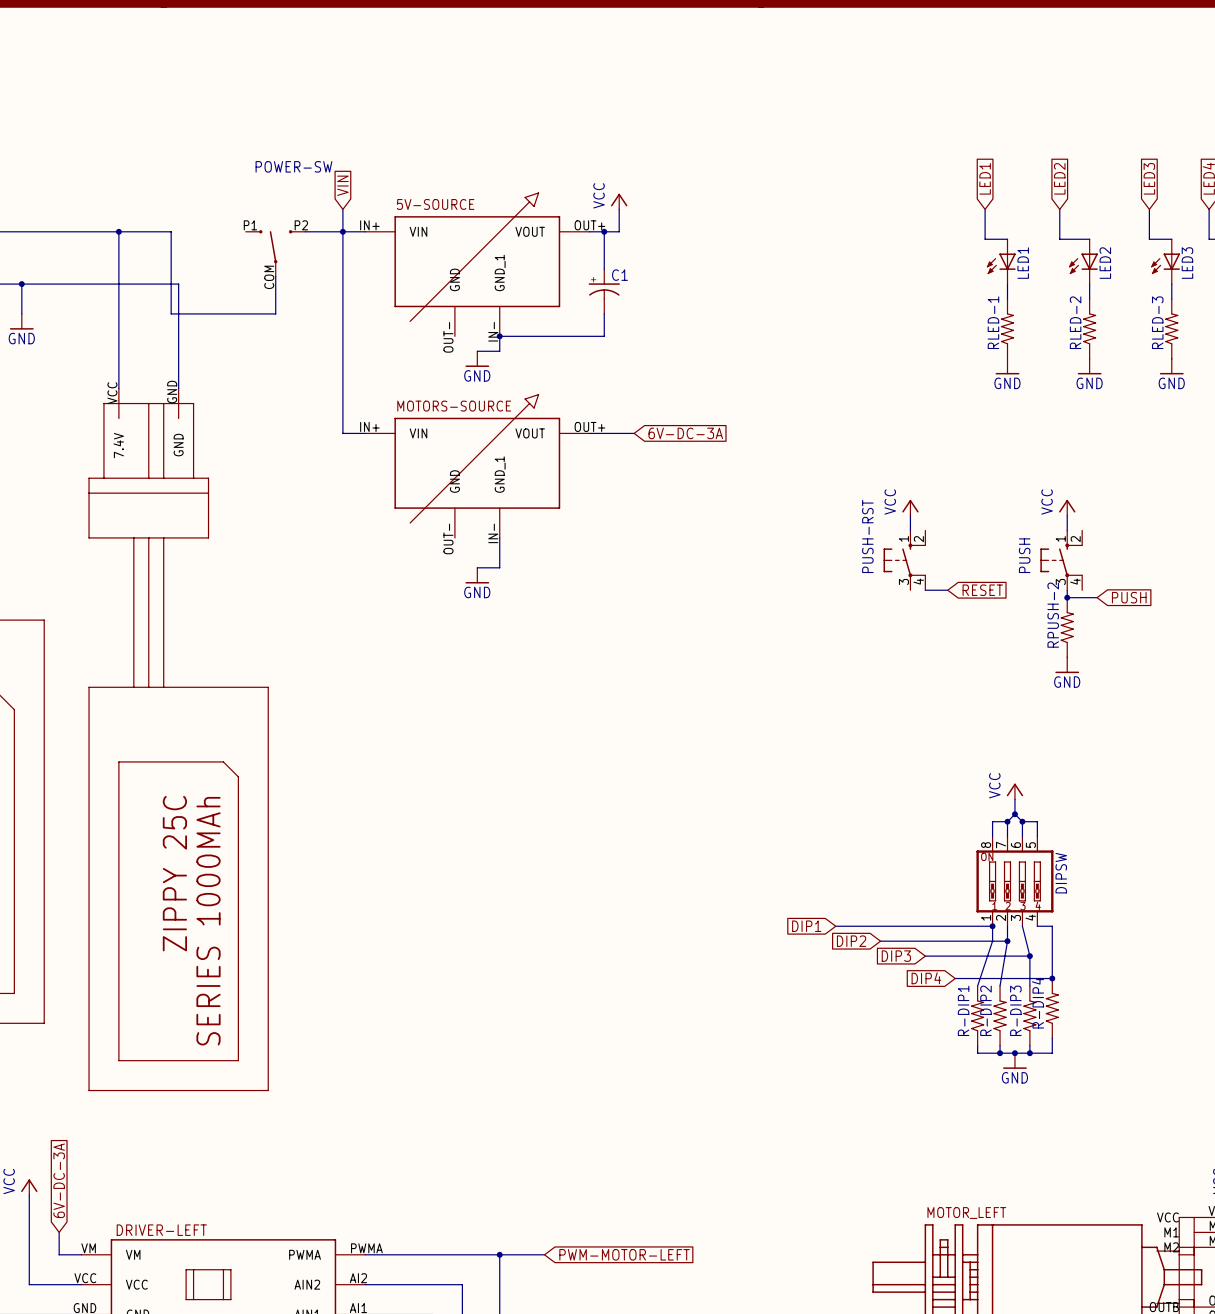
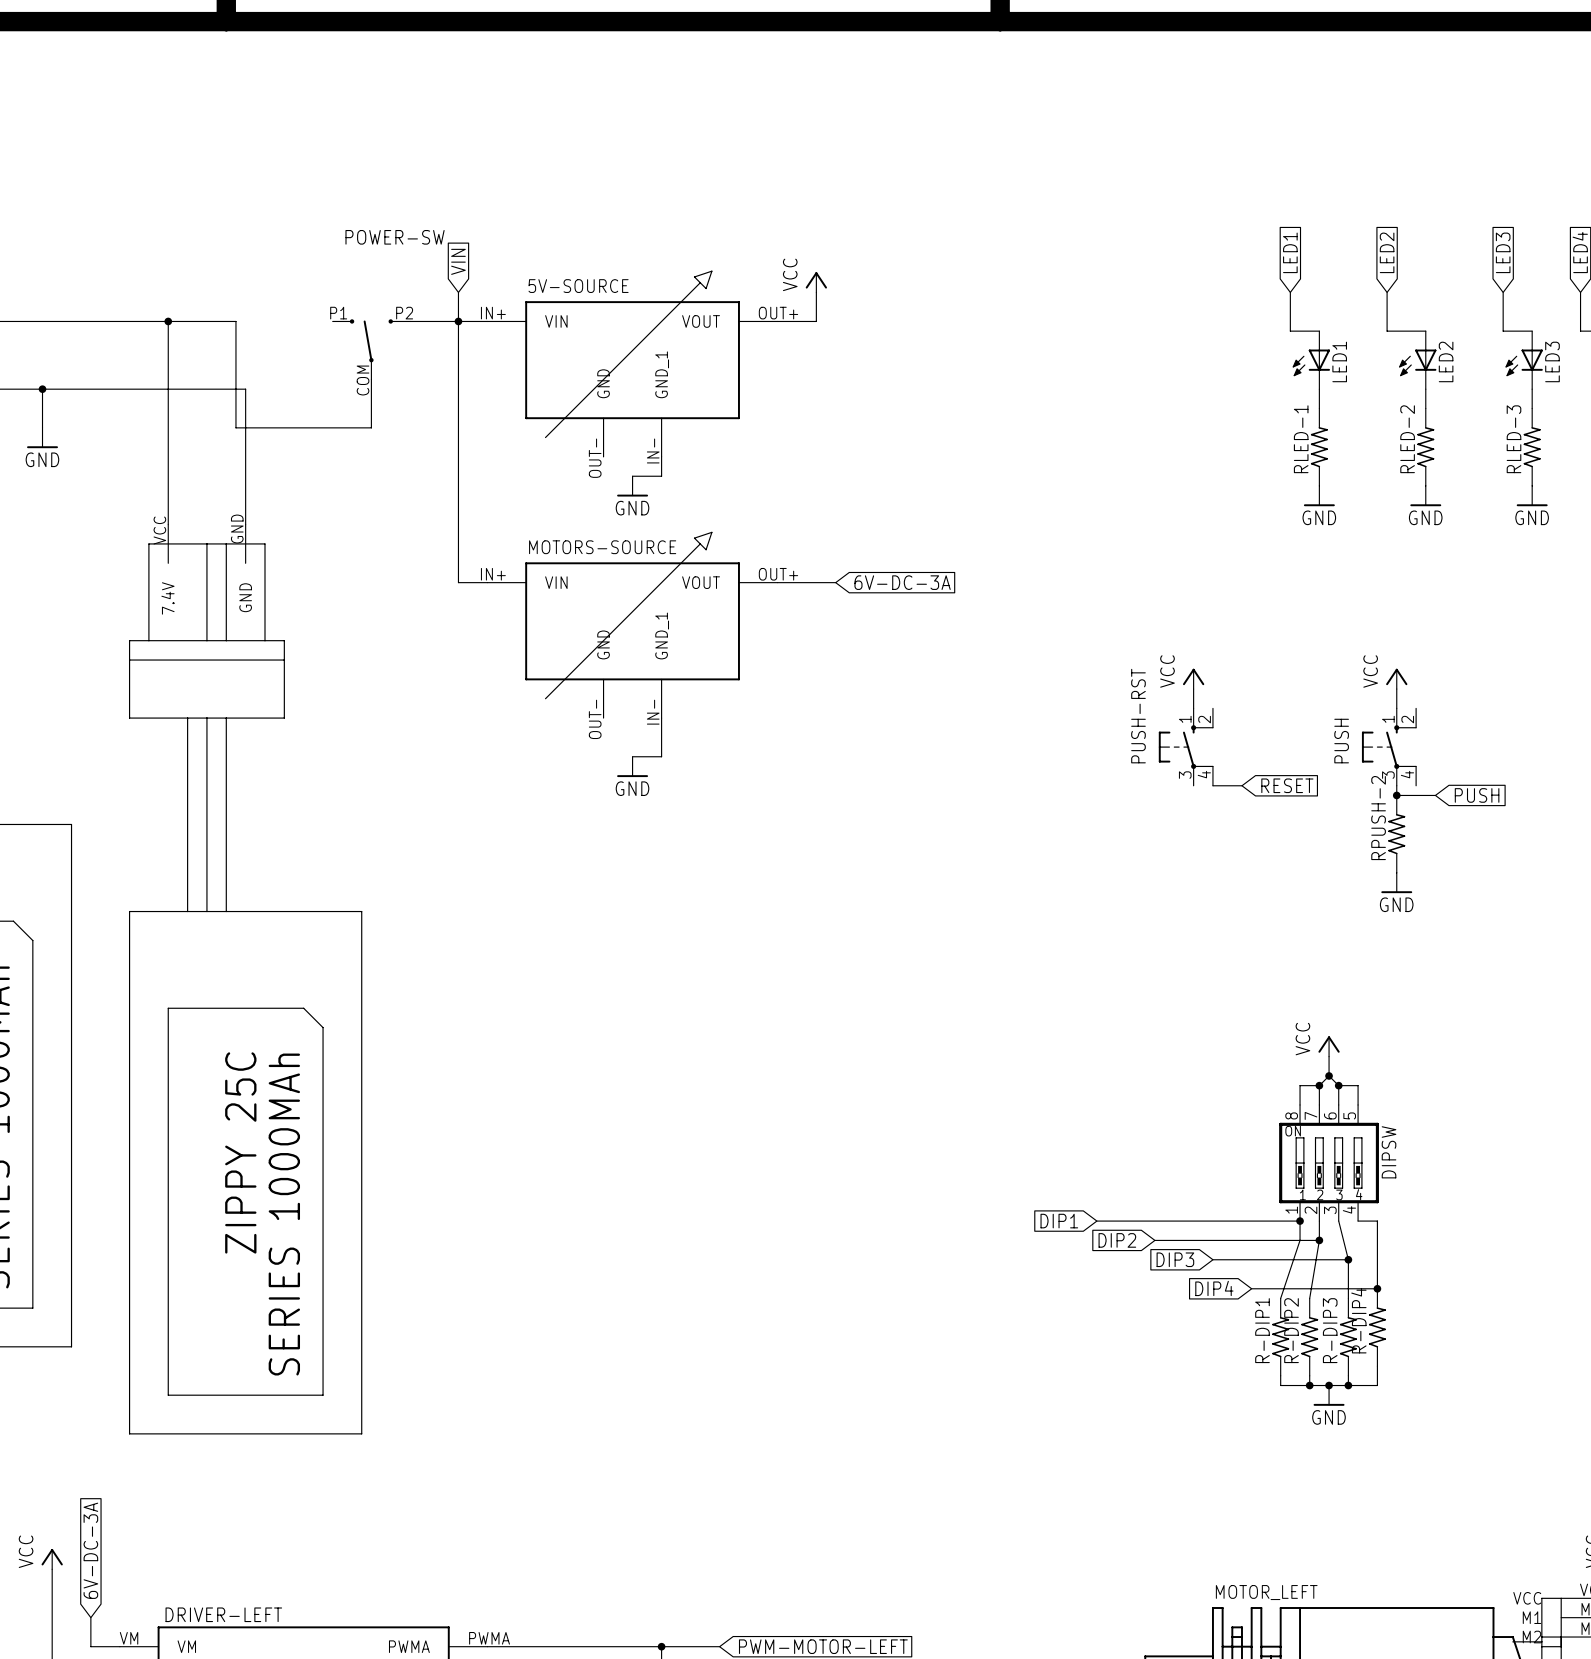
wire: (604, 231) (604, 269) -> none
junction: (604, 231) -> none
C1: (604, 291) -> none
wire: (604, 313) (604, 336) (499, 336) -> none
junction: (499, 336) -> none

